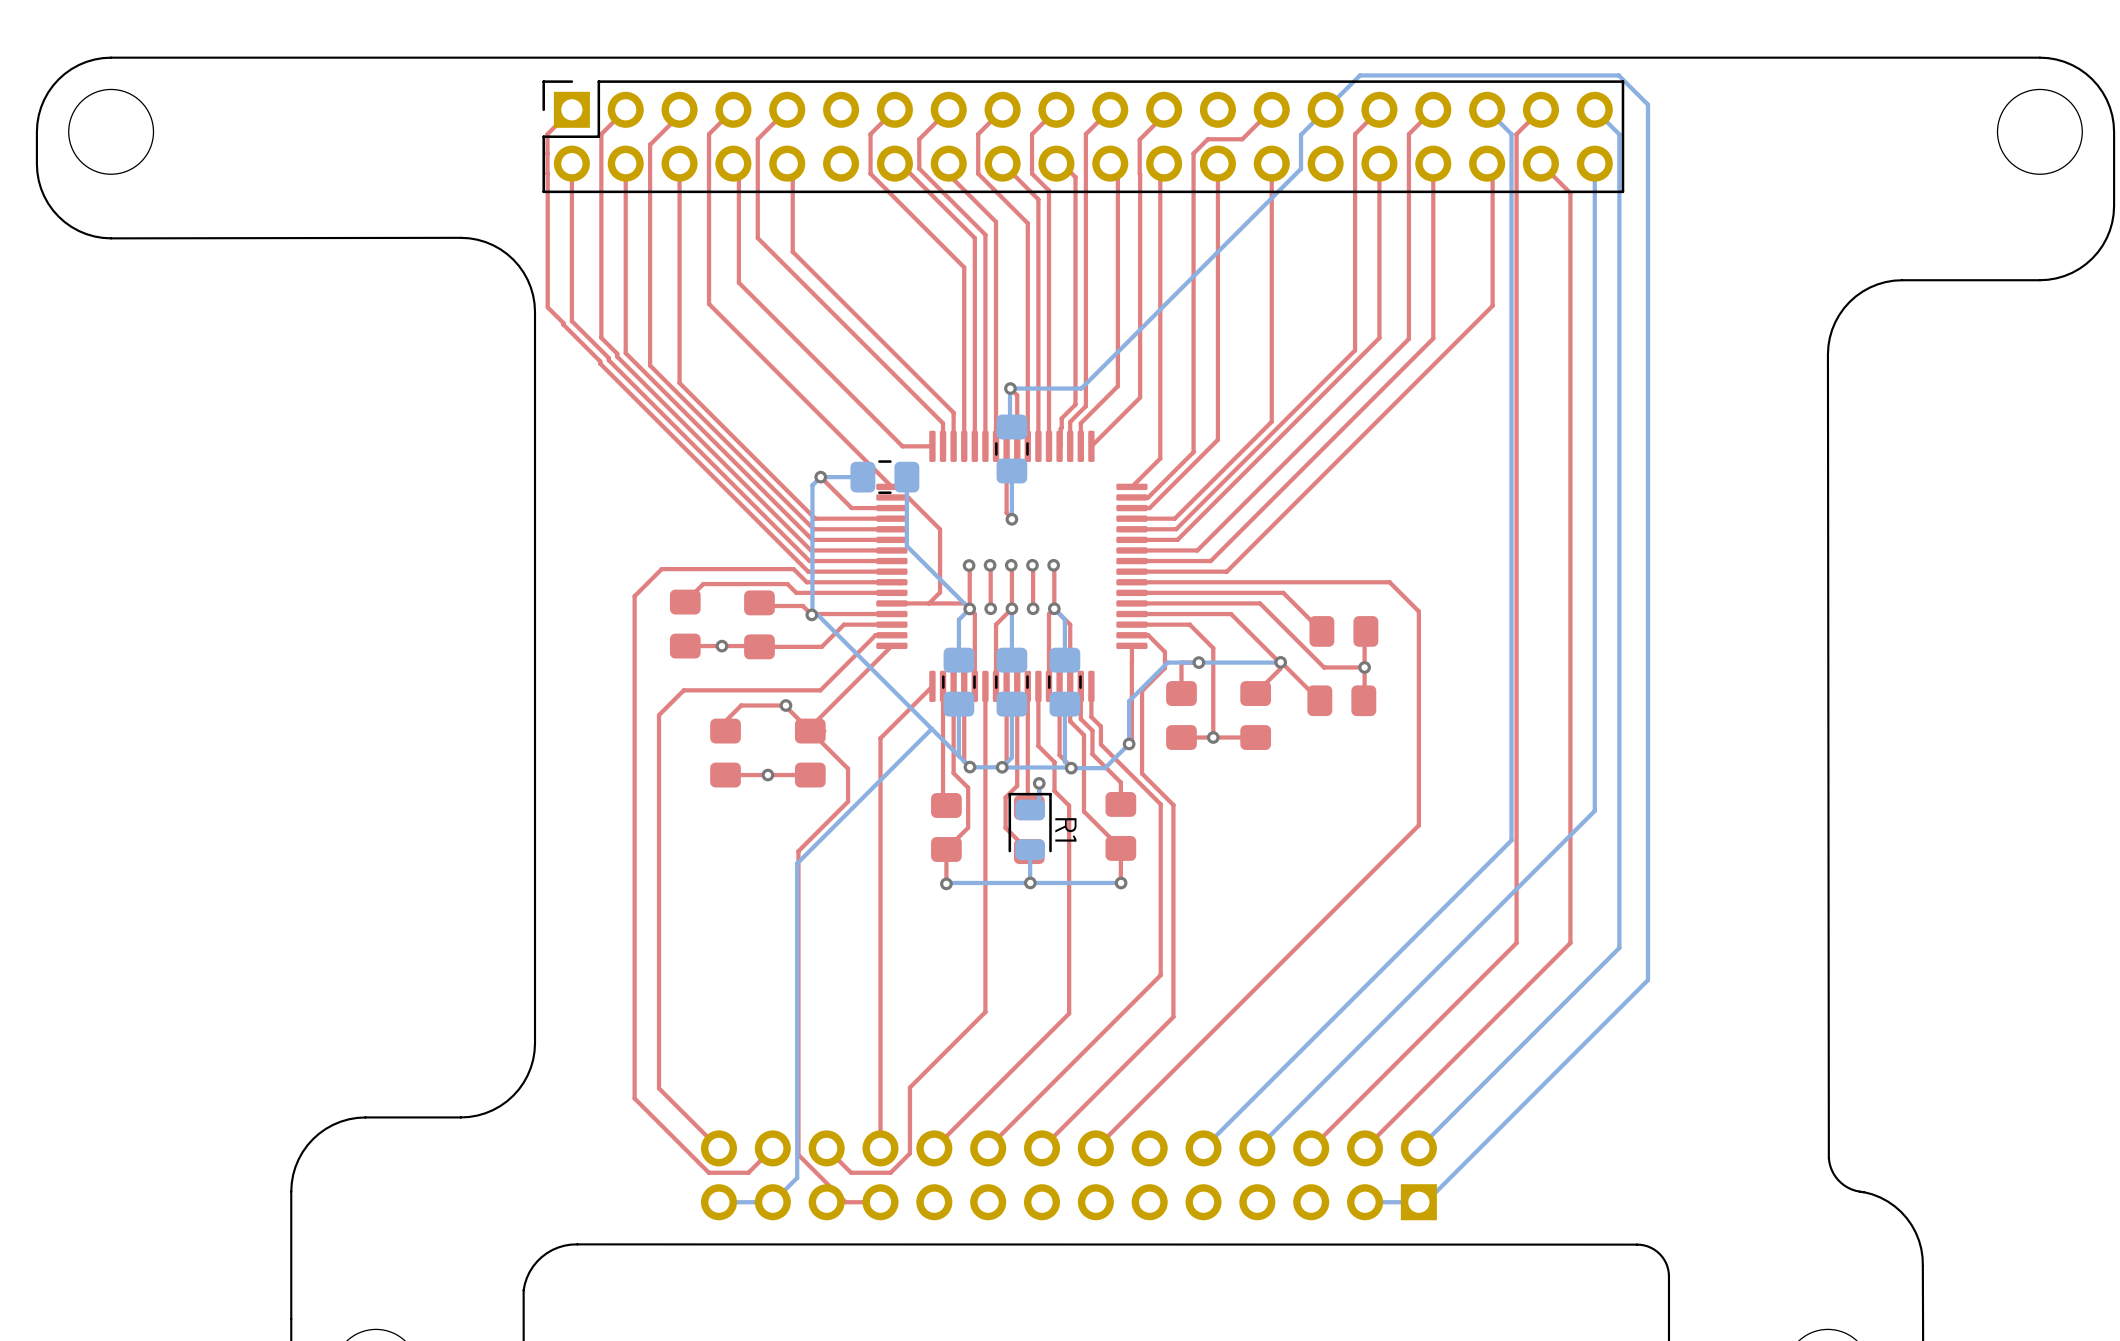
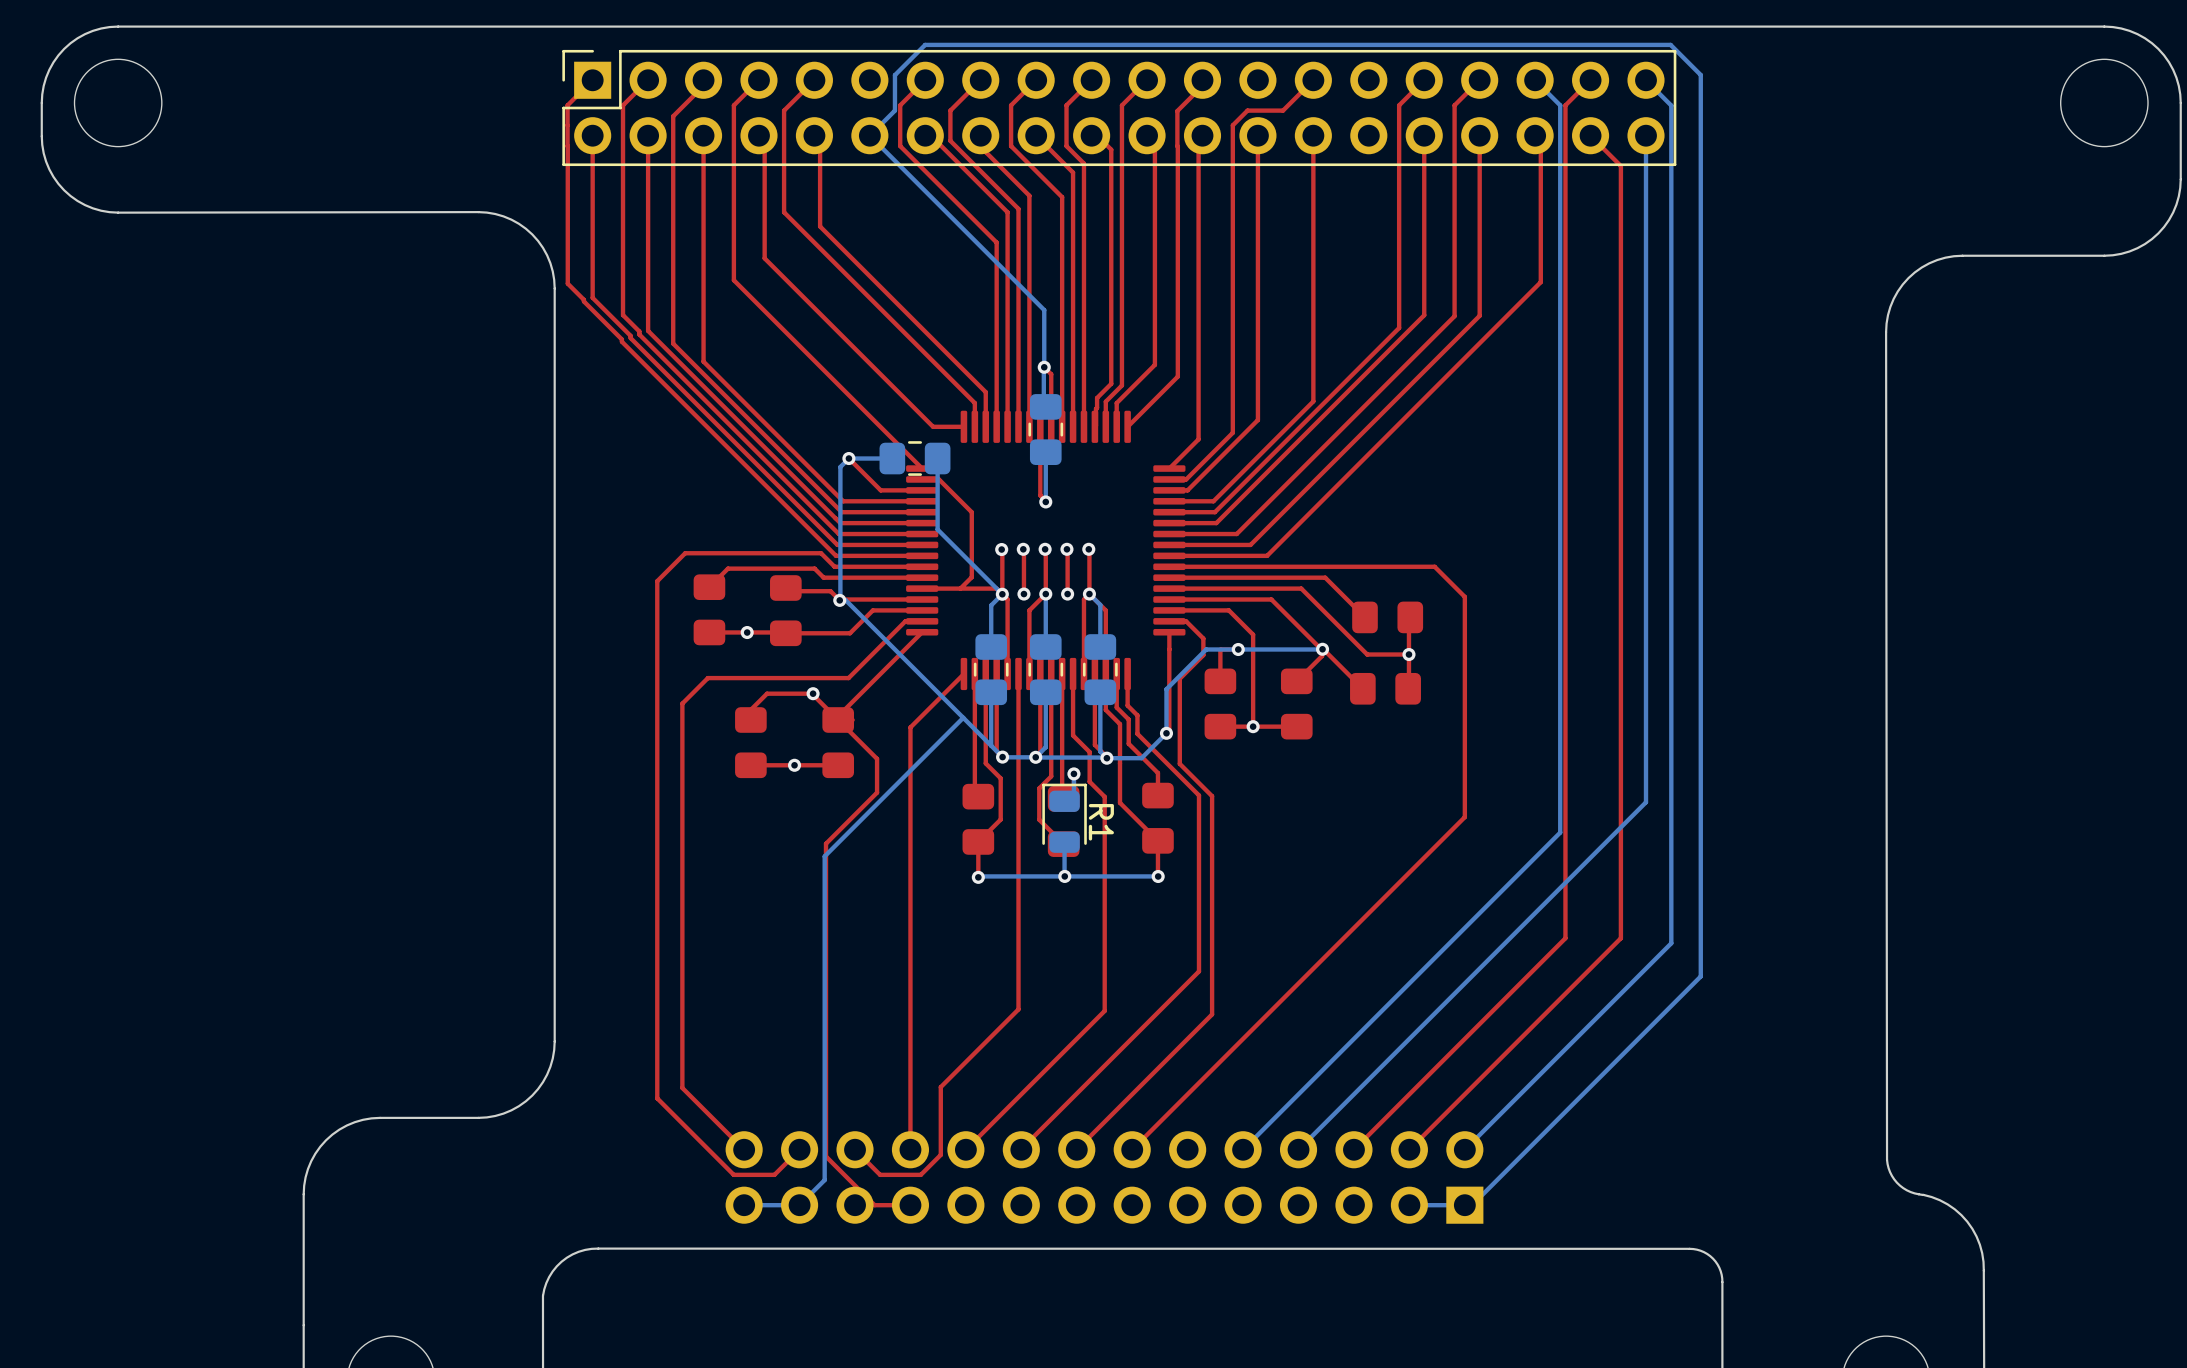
bottom track: (1359, 75) (1325, 109) -> none
bottom track: (1323, 112) (1301, 134) (1301, 168) (1081, 388) (1010, 388) -> (1404, 44) (925, 44) (894, 75) (894, 110) (869, 135) (1044, 310) (1044, 367)

